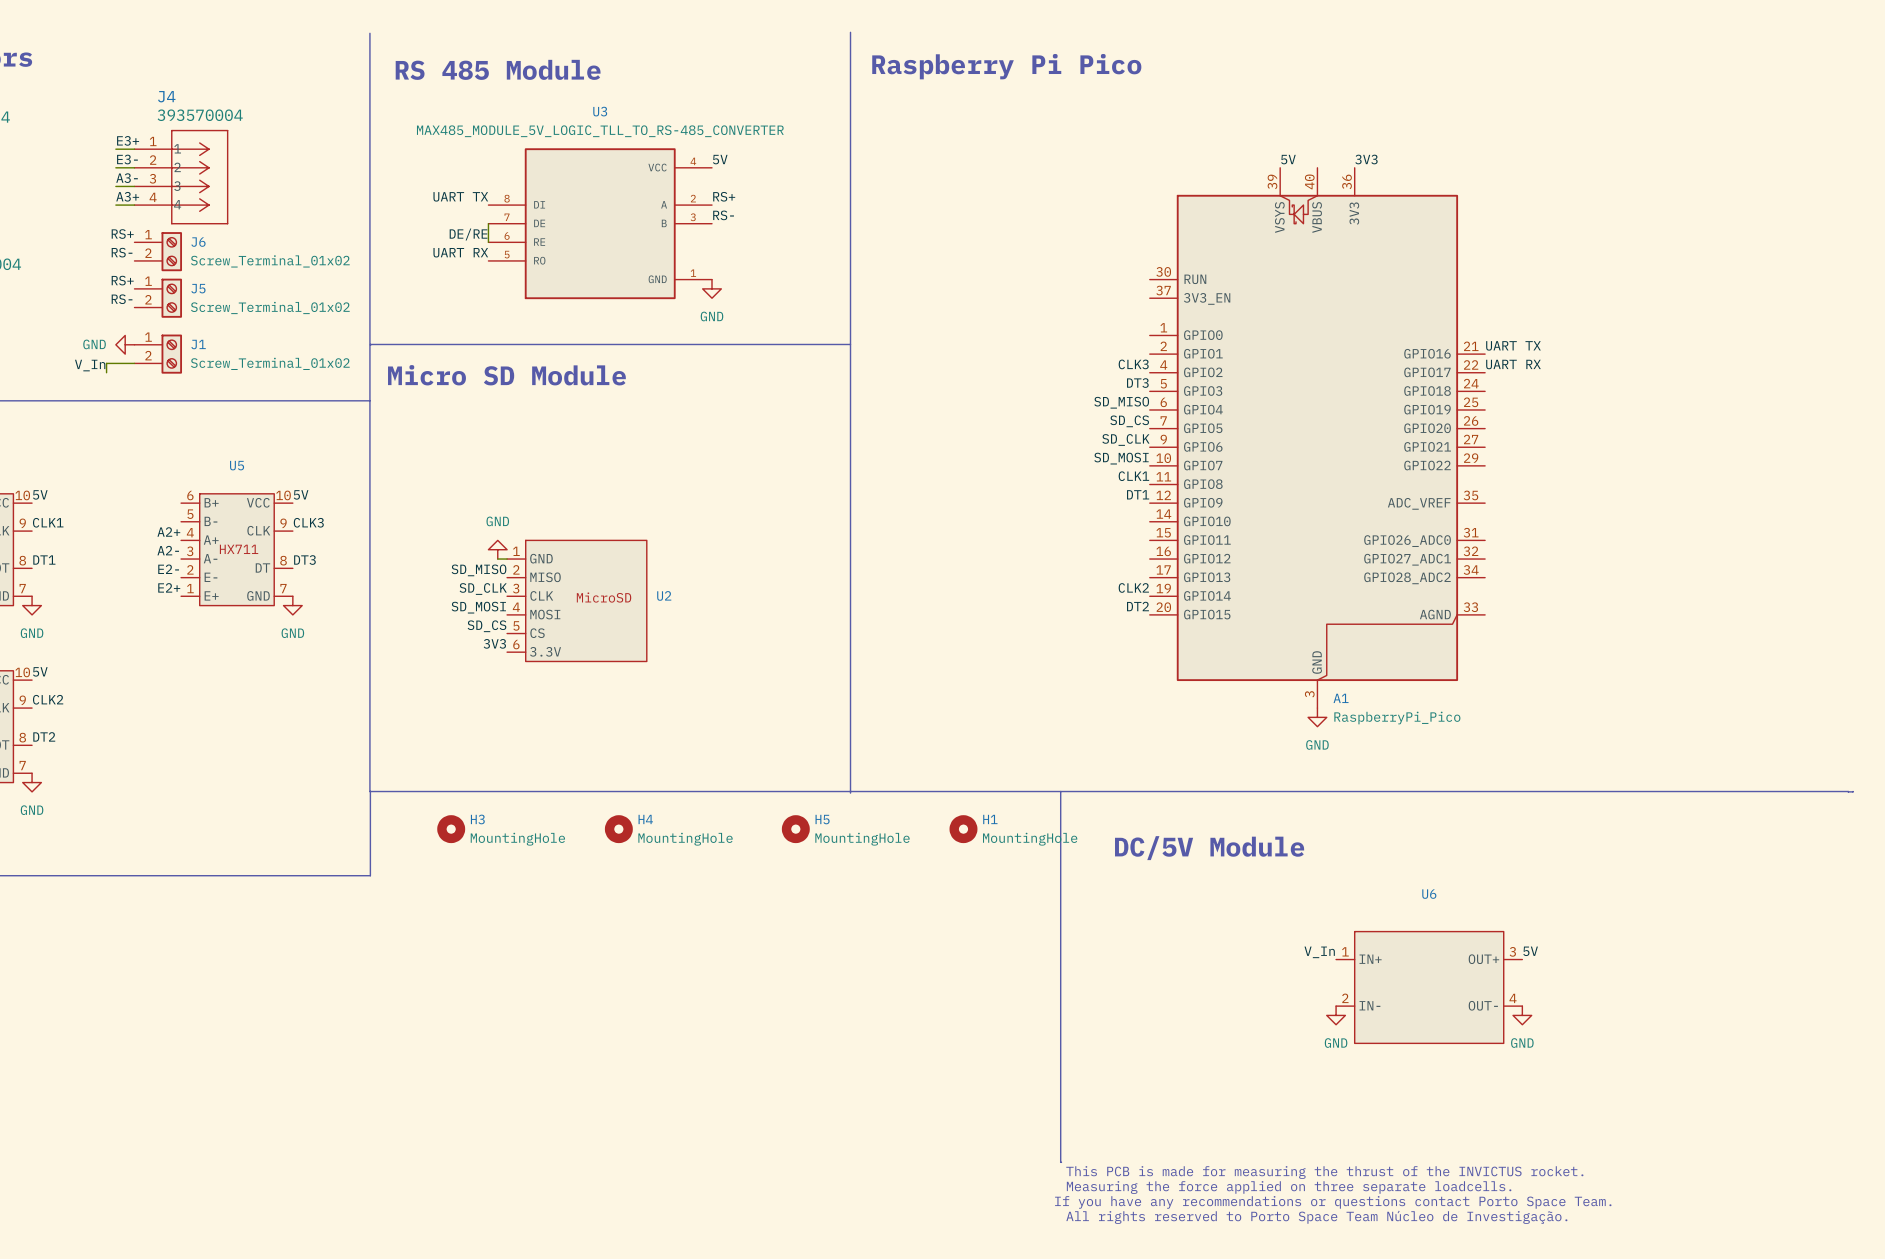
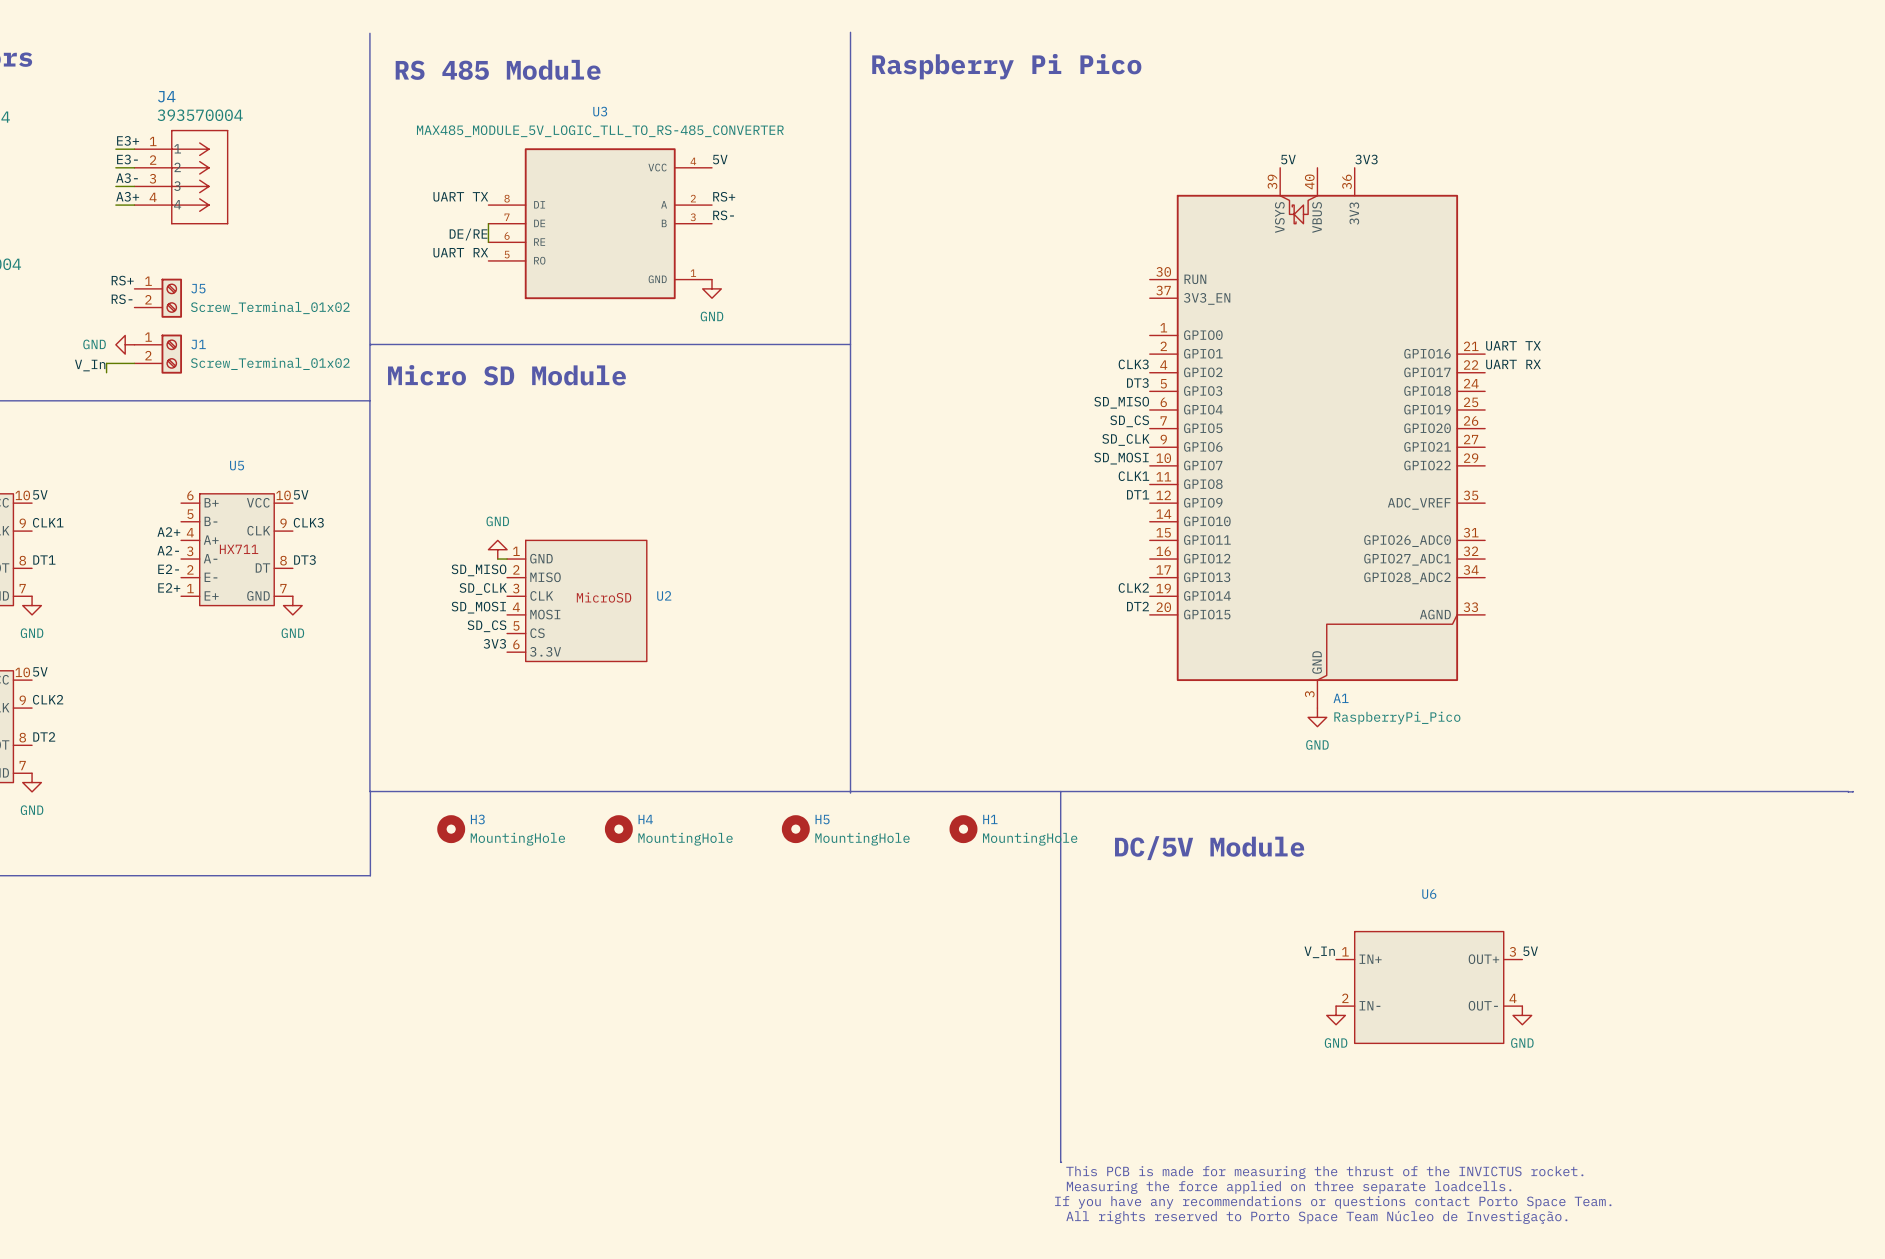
label: RS+ (122, 234) -> none
J6: Screw_Terminal_01x02 (158, 251) -> none
label: RS- (122, 252) -> none

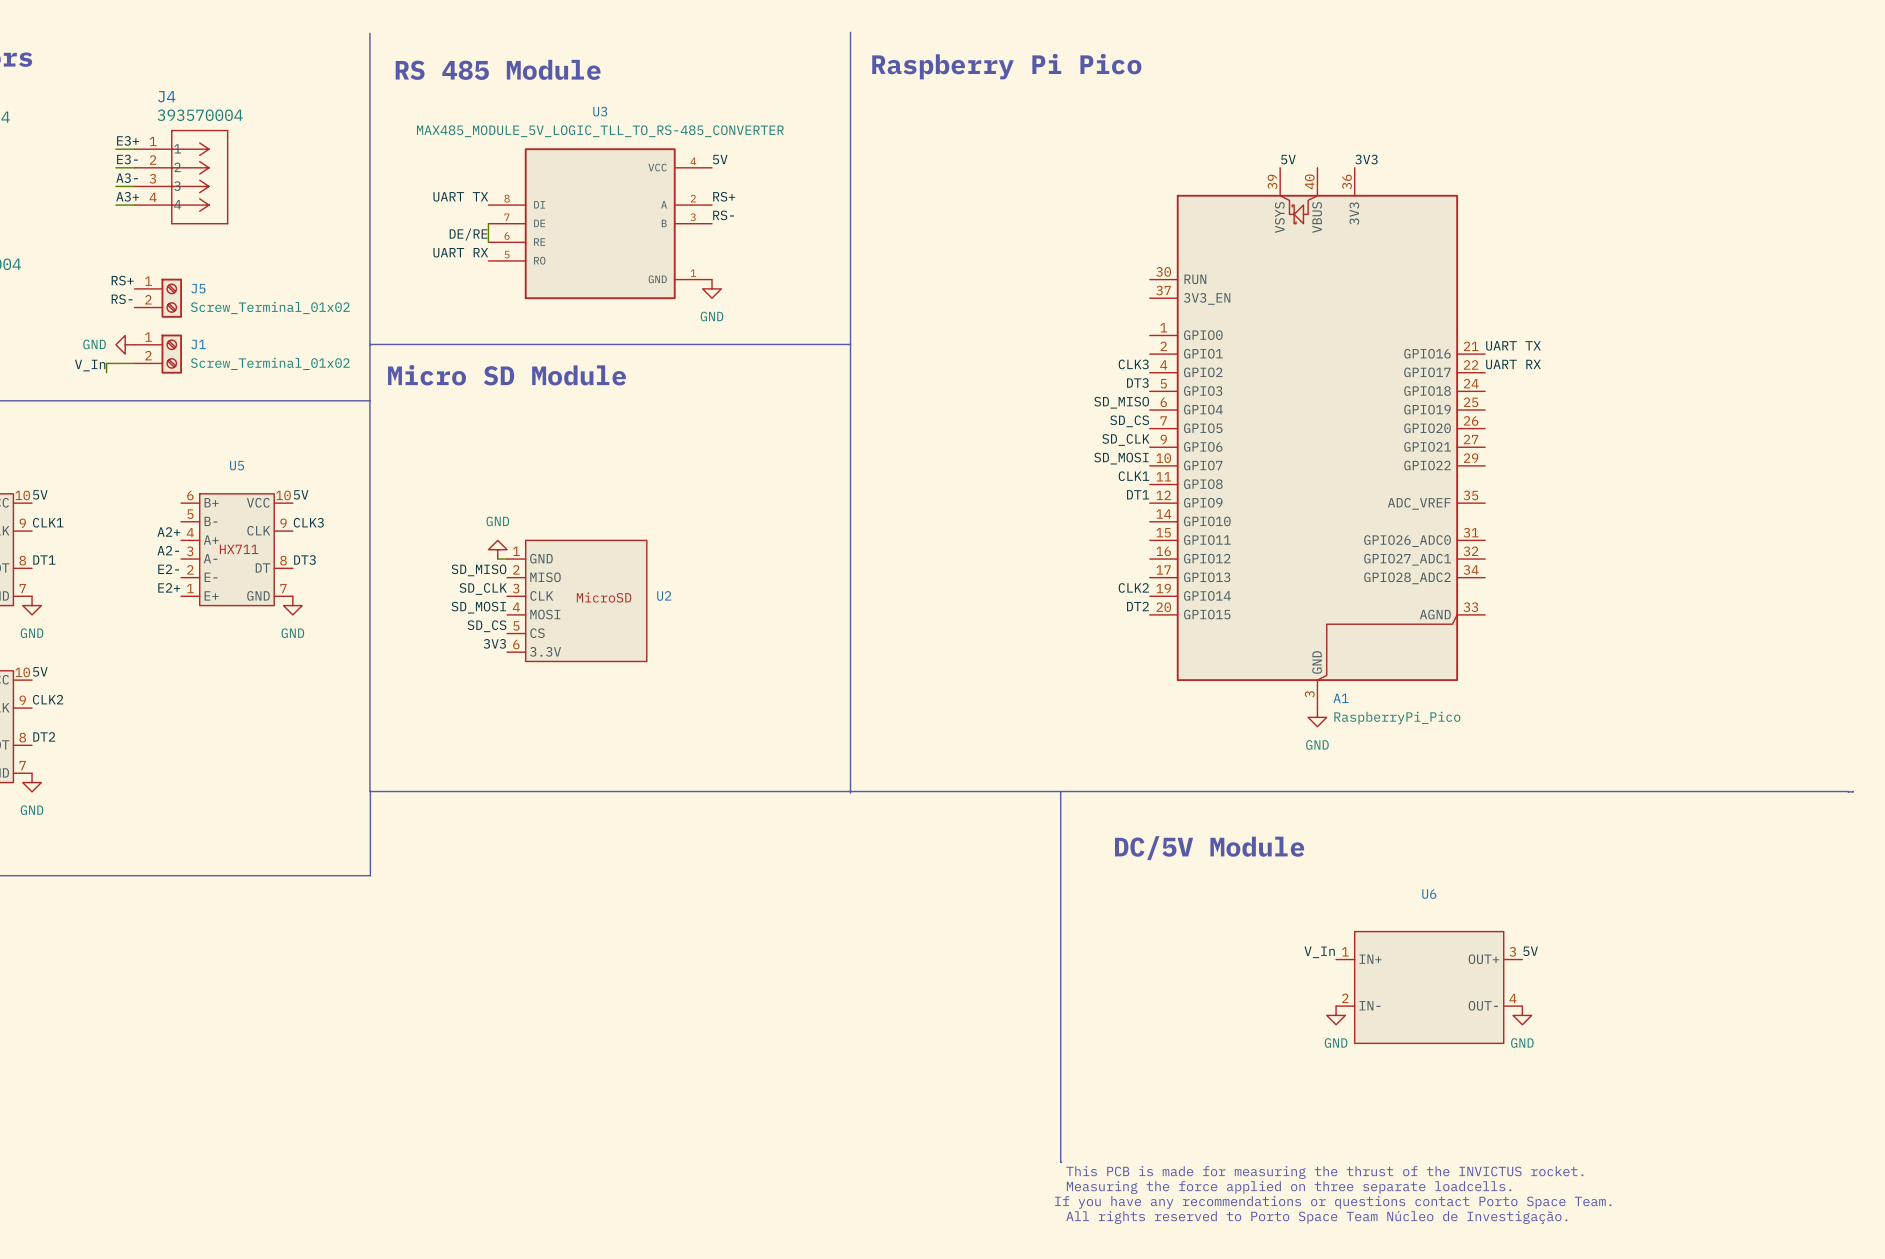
H3: MountingHole (451, 829) -> none
H4: MountingHole (618, 829) -> none
H5: MountingHole (795, 829) -> none
H1: MountingHole (963, 829) -> none

